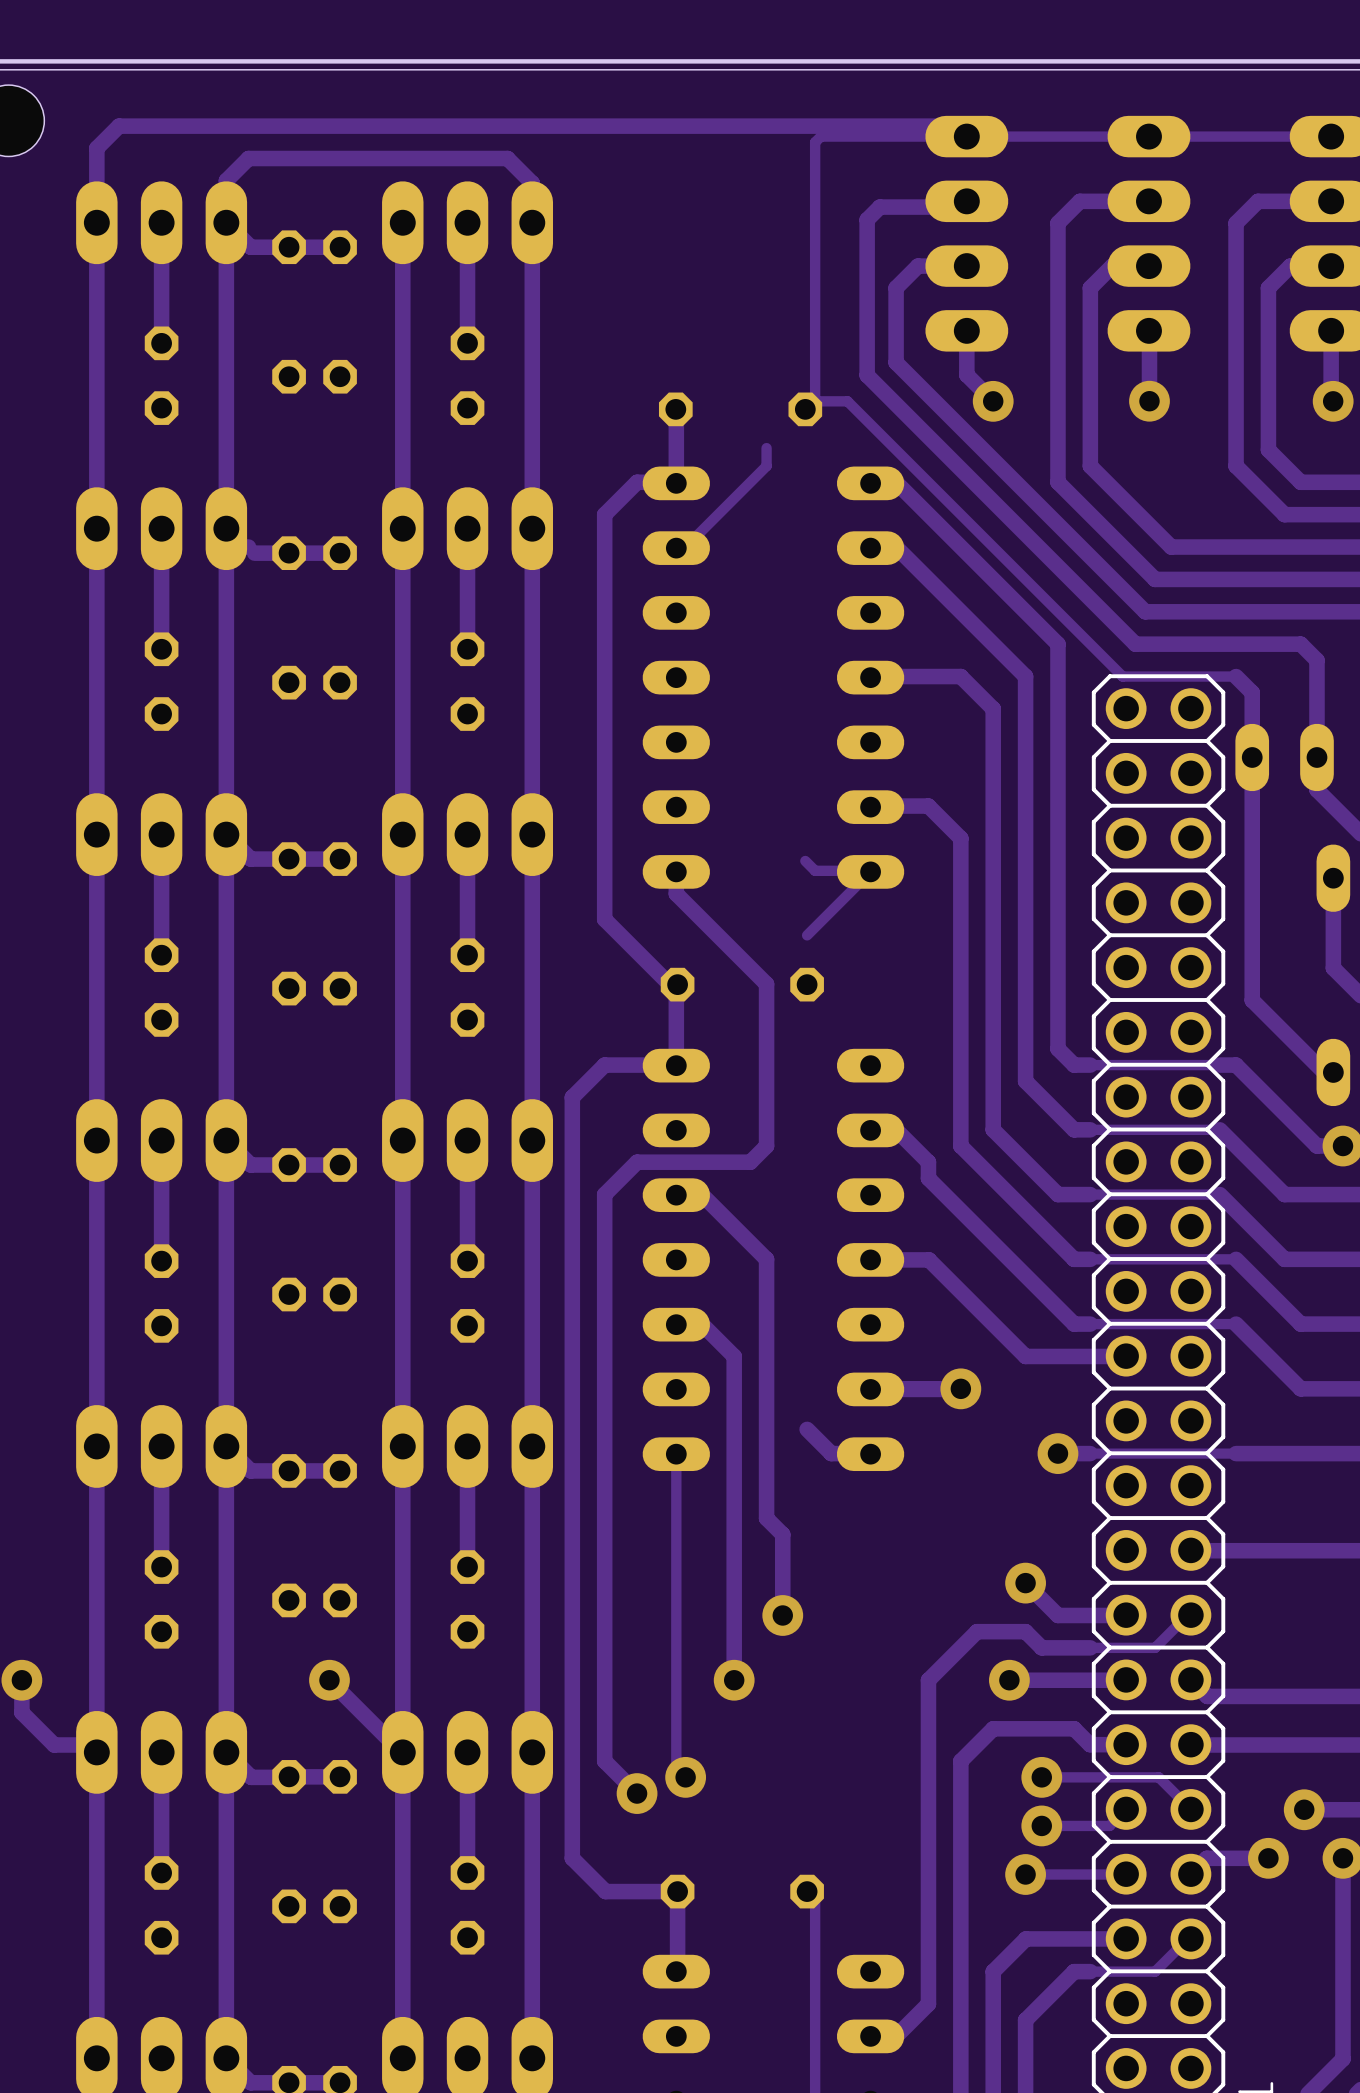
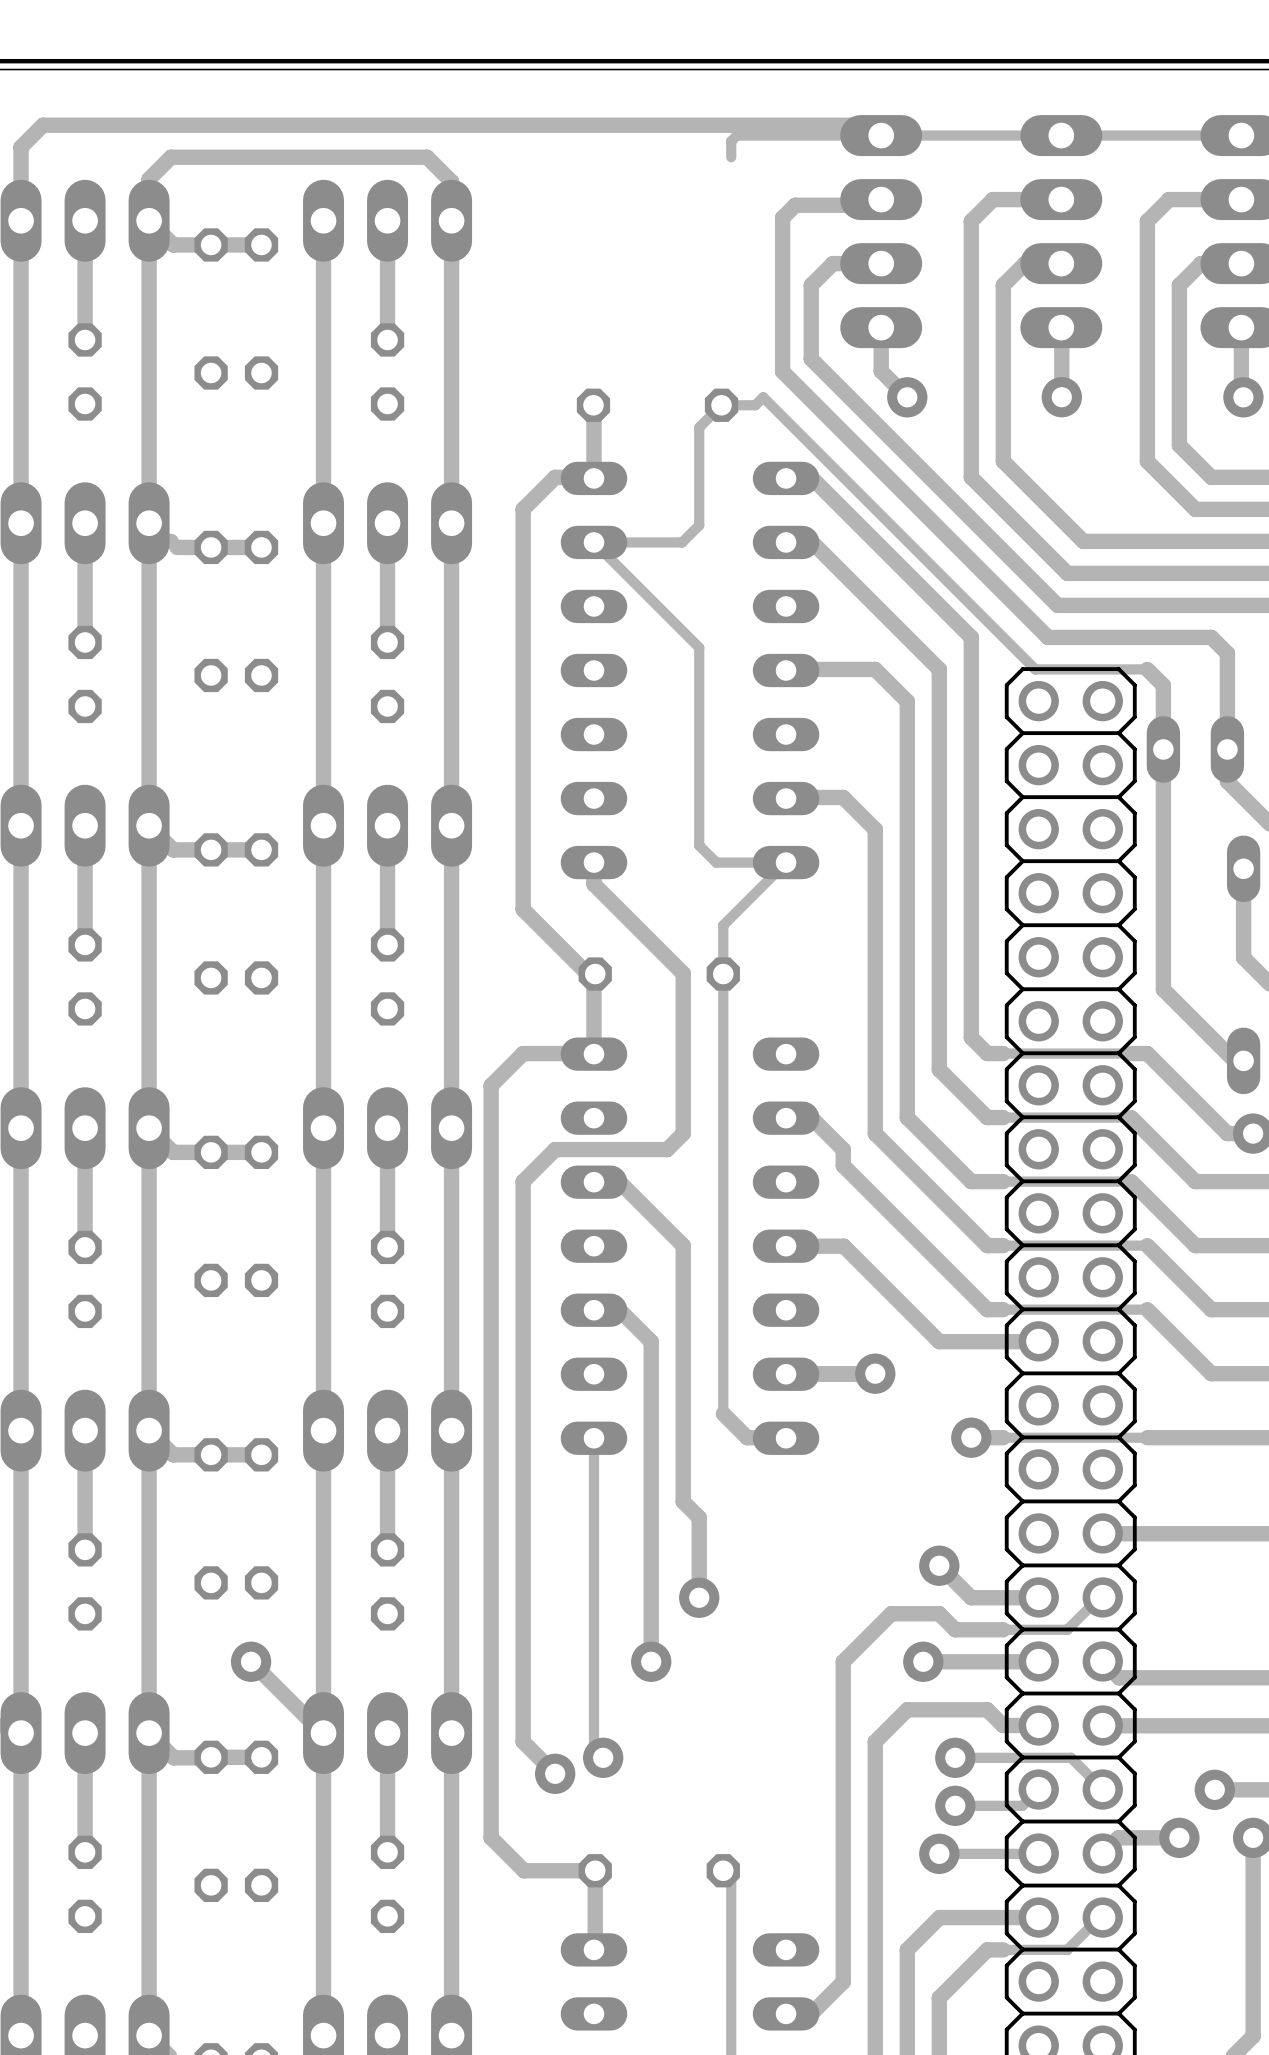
track: (815, 158) (815, 399) -> none
track: (847, 401) (813, 401) -> none
track: (766, 448) (766, 466) (684, 548) -> (763, 397) (755, 405) (721, 405) (699, 427) (699, 525) (682, 542) (602, 542)
track: (805, 860) (815, 870) (870, 871) -> (593, 542) (699, 647) (699, 845) (716, 862) (786, 862)
track: none -> (723, 925) (723, 1413)

